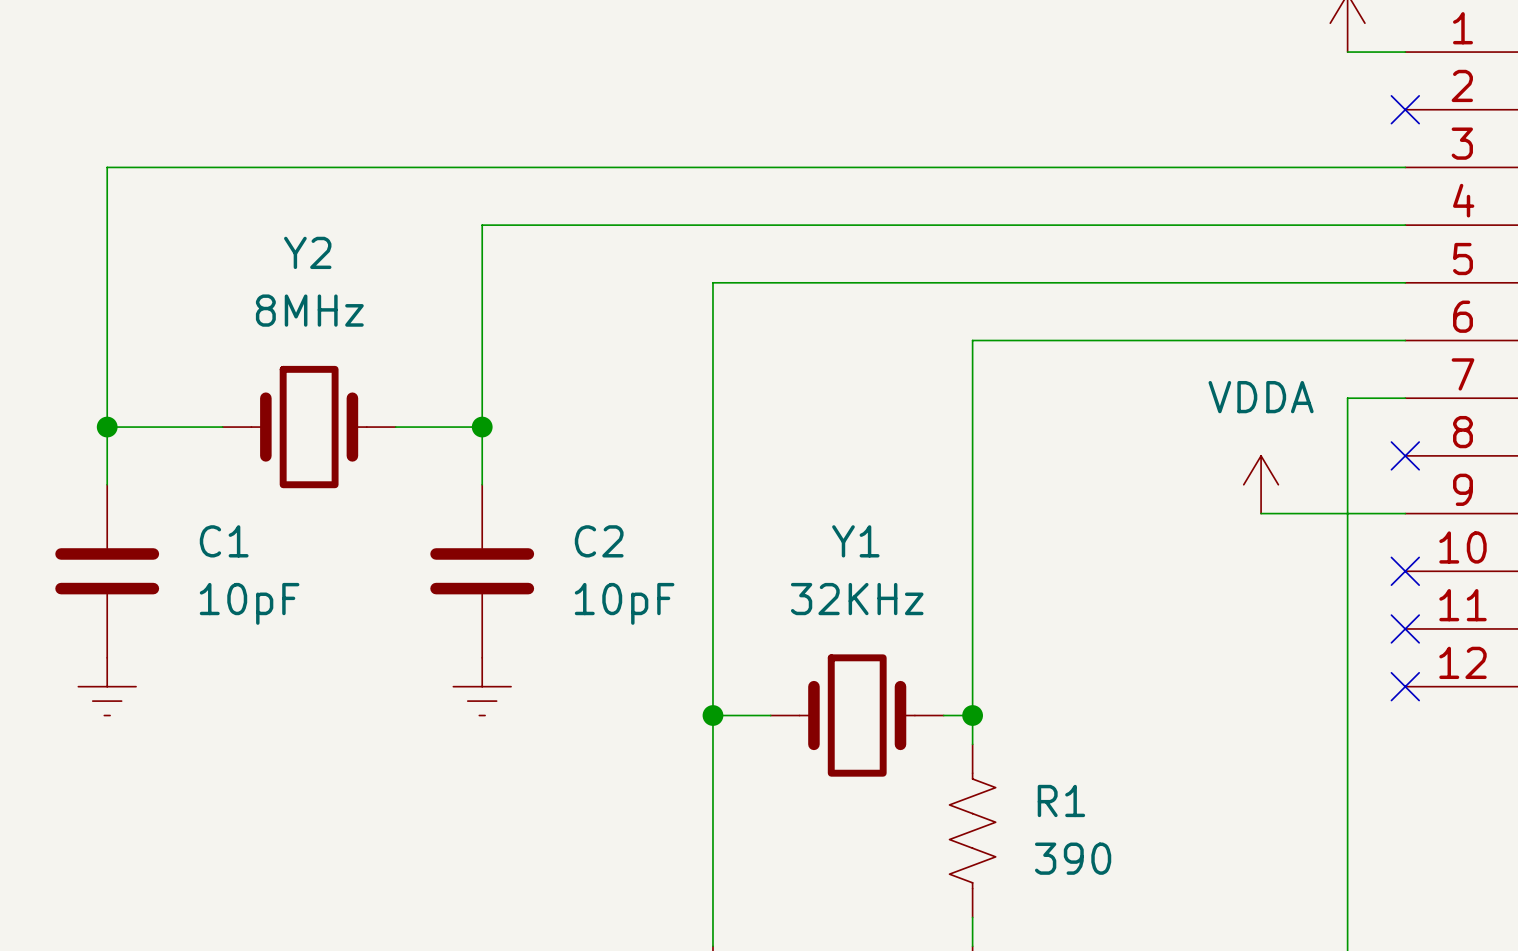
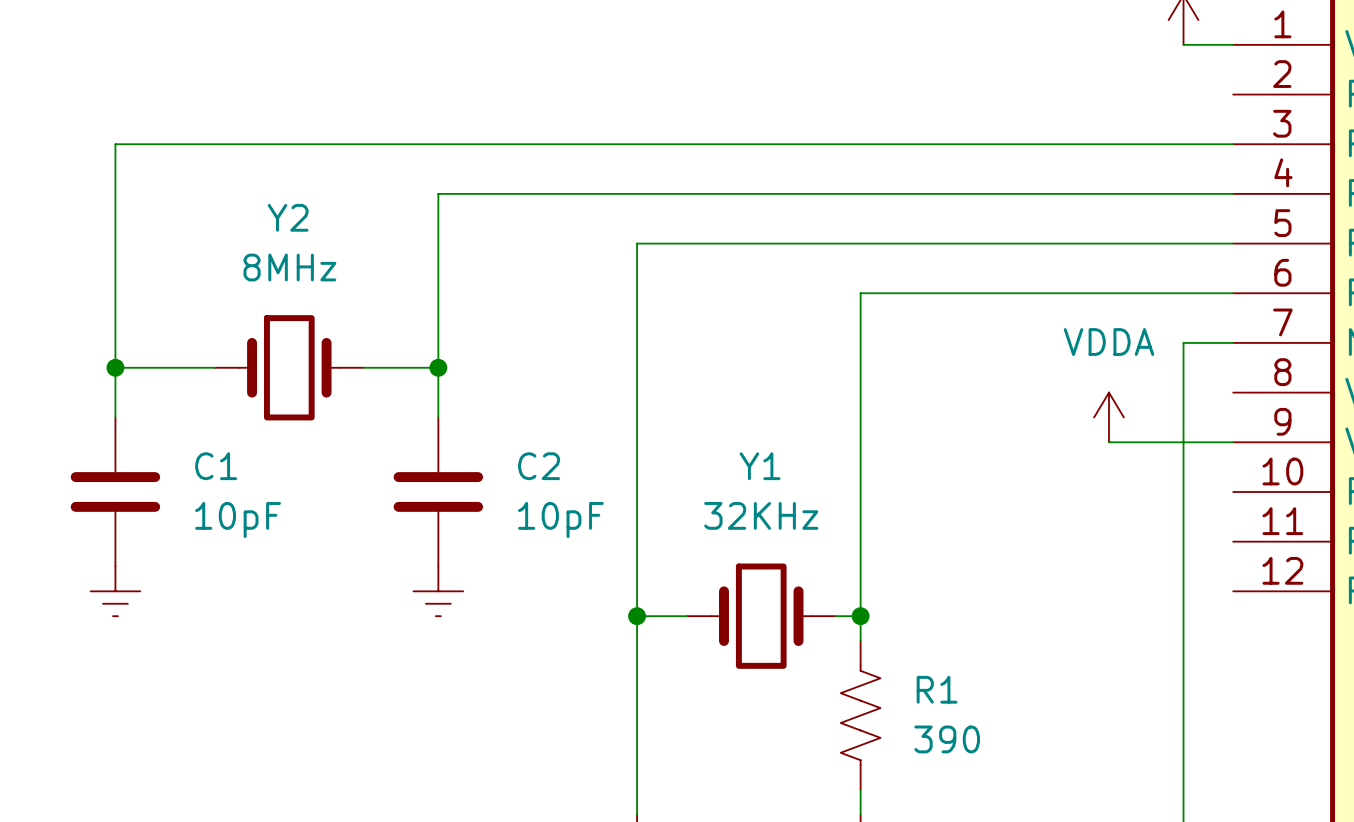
no-connect mark: (1405, 109) -> none
no-connect mark: (1405, 455) -> none
no-connect mark: (1405, 571) -> none
no-connect mark: (1405, 628) -> none
no-connect mark: (1405, 686) -> none

